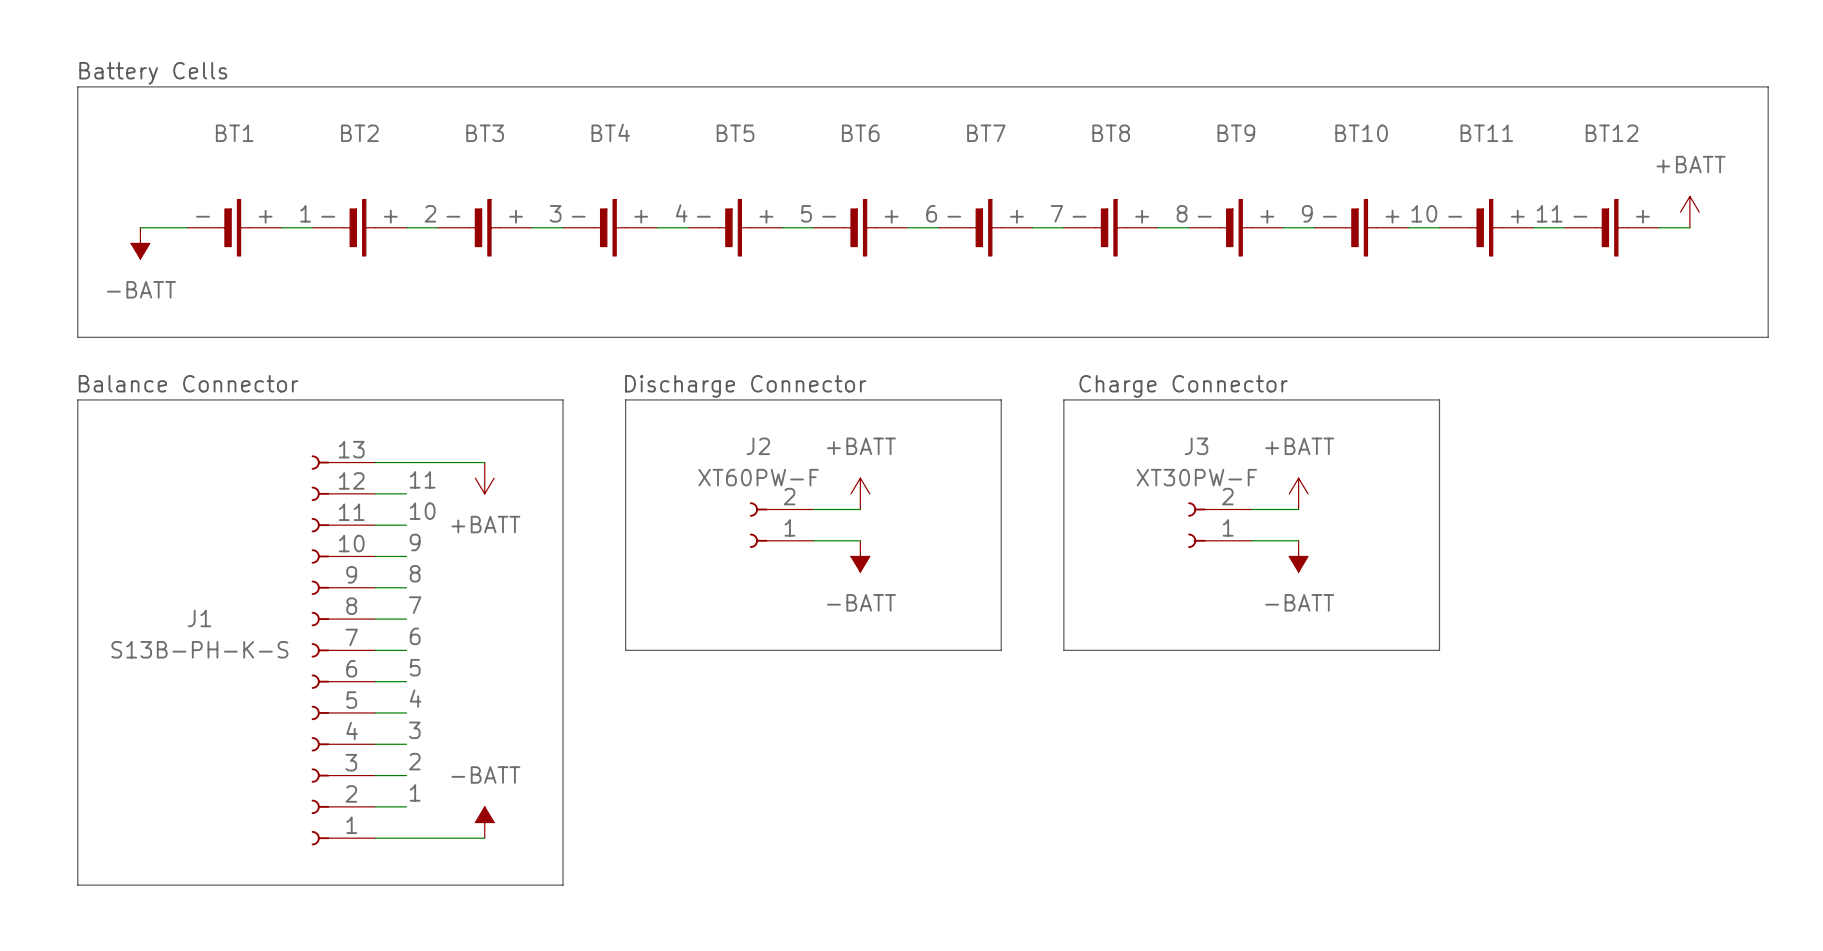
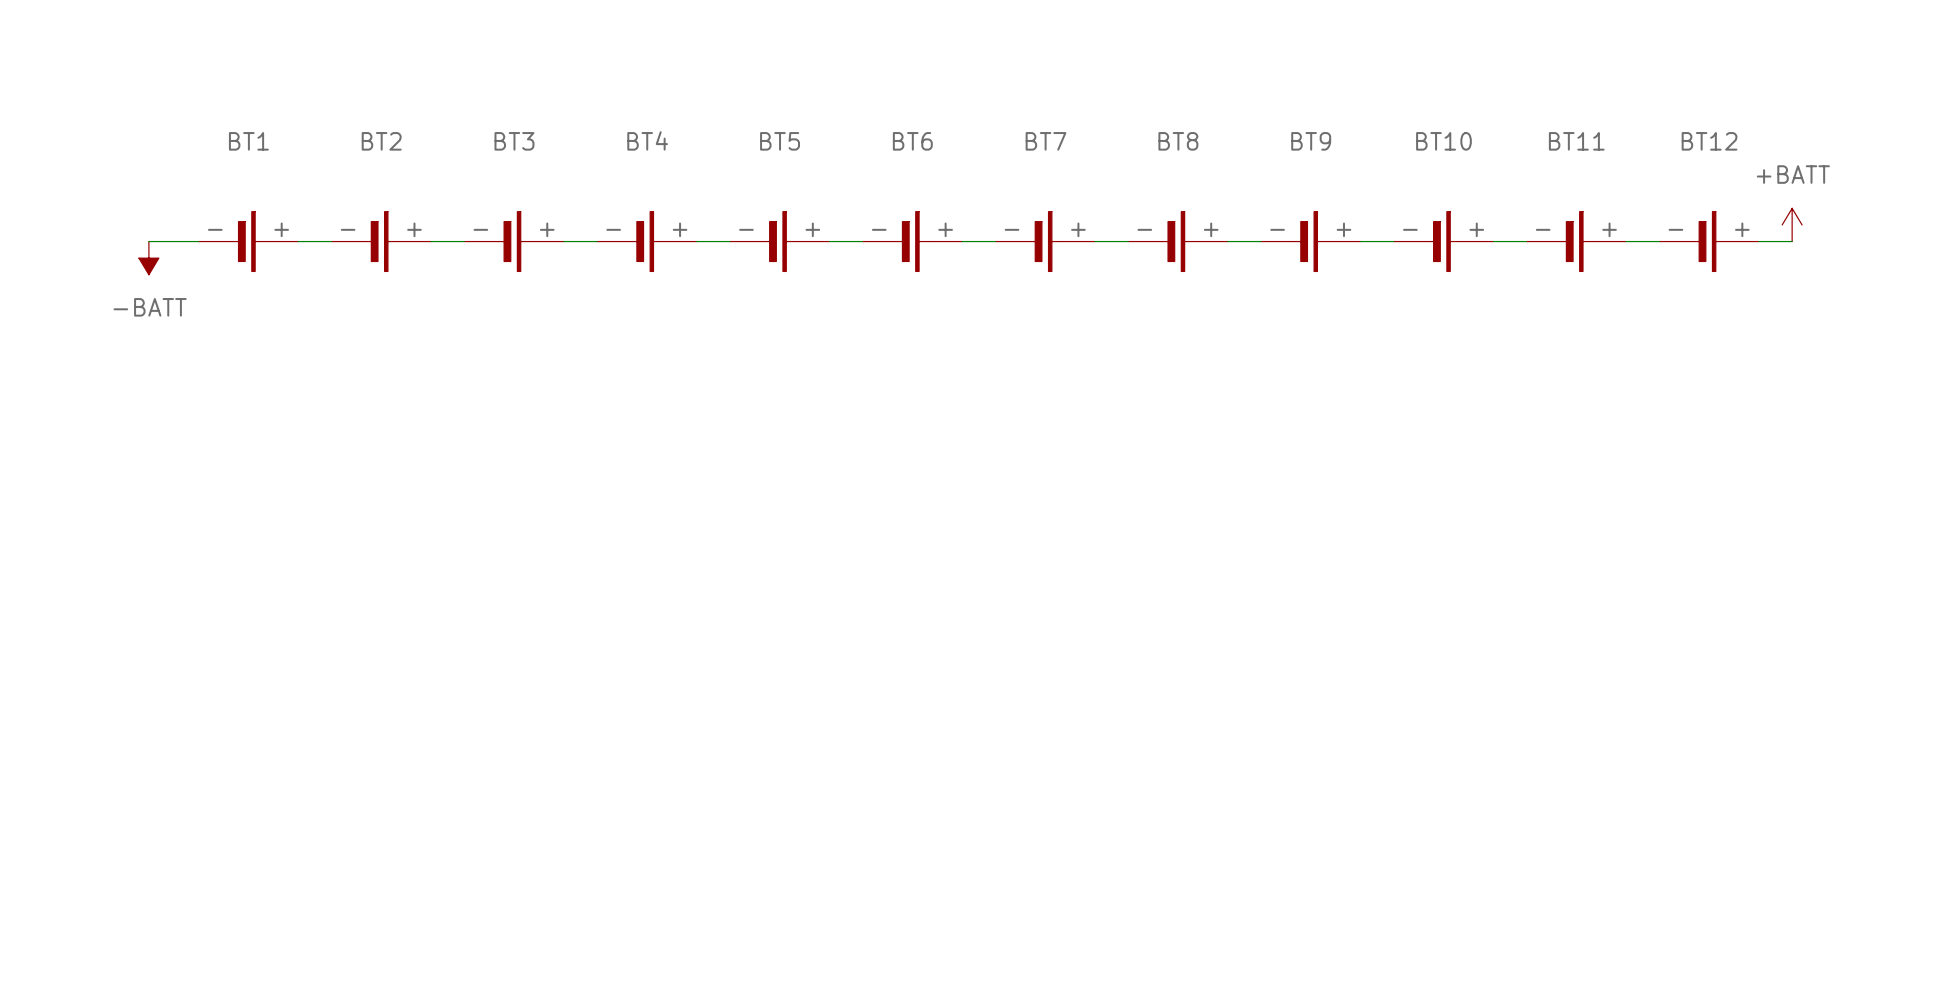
text: Battery Cells (153, 73) -> none
line: (77, 86) (77, 337) (1768, 337) (1768, 86) (77, 86) -> none
label: 1 (305, 213) -> none
label: 2 (430, 213) -> none
label: 3 (555, 213) -> none
label: 4 (681, 213) -> none
label: 5 (806, 213) -> none
label: 6 (931, 213) -> none
label: 7 (1056, 213) -> none
label: 8 (1182, 213) -> none
label: 9 (1307, 213) -> none
label: 10 (1424, 213) -> none
label: 11 (1549, 213) -> none
text: Balance Connector (188, 383) -> none
text: Discharge Connector (745, 386) -> none
text: Charge Connector (1183, 386) -> none
line: (77, 399) (563, 399) (563, 885) (77, 885) (77, 399) -> none
line: (625, 399) (1001, 399) (1001, 650) (625, 650) (625, 399) -> none
line: (1063, 399) (1439, 399) (1439, 650) (1063, 650) (1063, 399) -> none
wire: (375, 462) (484, 462) -> none
power symbol: +BATT (484, 478) -> none
label: 11 (422, 479) -> none
wire: (375, 493) (406, 493) -> none
power symbol: +BATT (860, 493) -> none
power symbol: +BATT (1298, 493) -> none
wire: (813, 509) (860, 509) -> none
wire: (1251, 509) (1298, 509) -> none
label: 10 (422, 511) -> none
wire: (375, 525) (406, 525) -> none
J2: XT60PW-F (781, 525) -> none
J3: XT30PW-F (1219, 525) -> none
wire: (813, 540) (860, 540) -> none
wire: (1251, 540) (1298, 540) -> none
label: 9 (415, 542) -> none
wire: (375, 556) (406, 556) -> none
power symbol: -BATT (860, 556) -> none
power symbol: -BATT (1298, 556) -> none
label: 8 (415, 573) -> none
wire: (375, 587) (406, 587) -> none
label: 7 (415, 605) -> none
wire: (375, 619) (406, 619) -> none
label: 6 (415, 636) -> none
J1: S13B-PH-K-S (343, 650) -> none
wire: (375, 650) (406, 650) -> none
label: 5 (415, 667) -> none
wire: (375, 681) (406, 681) -> none
label: 4 (415, 698) -> none
wire: (375, 712) (406, 712) -> none
label: 3 (414, 730) -> none
wire: (375, 744) (406, 744) -> none
label: 2 (414, 761) -> none
wire: (375, 775) (406, 775) -> none
label: 1 (415, 792) -> none
wire: (375, 806) (406, 806) -> none
power symbol: -BATT (484, 822) -> none
wire: (375, 838) (484, 838) -> none

